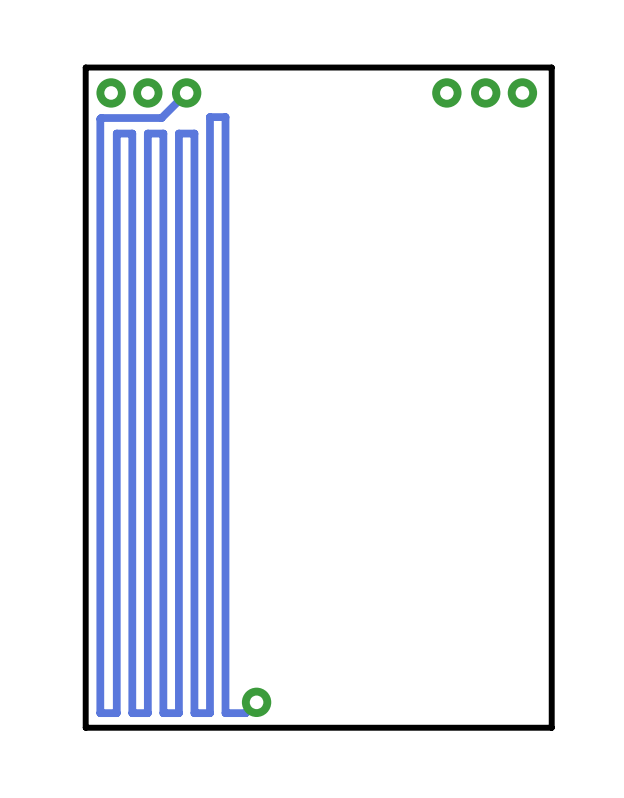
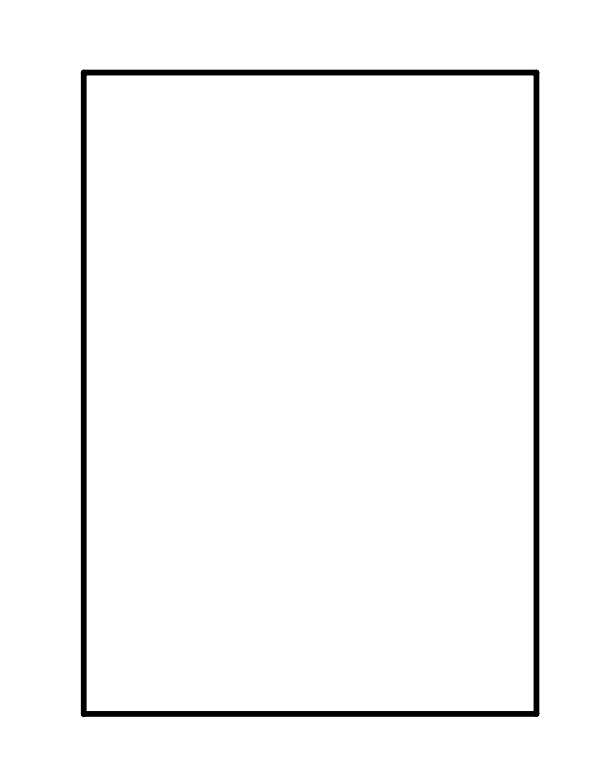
via: (111, 92) -> none
via: (147, 92) -> none
track: (186, 92) (161, 118) (100, 118) (100, 713) (116, 713) (116, 133) (132, 133) (132, 713) (147, 713) (147, 133) (163, 133) (163, 713) (178, 713) (178, 133) (194, 133) (194, 713) (209, 713) (209, 117) (225, 117) (225, 713) (245, 713) (256, 702) -> none
via: (186, 92) -> none
via: (446, 92) -> none
via: (485, 92) -> none
via: (522, 92) -> none
via: (256, 702) -> none

